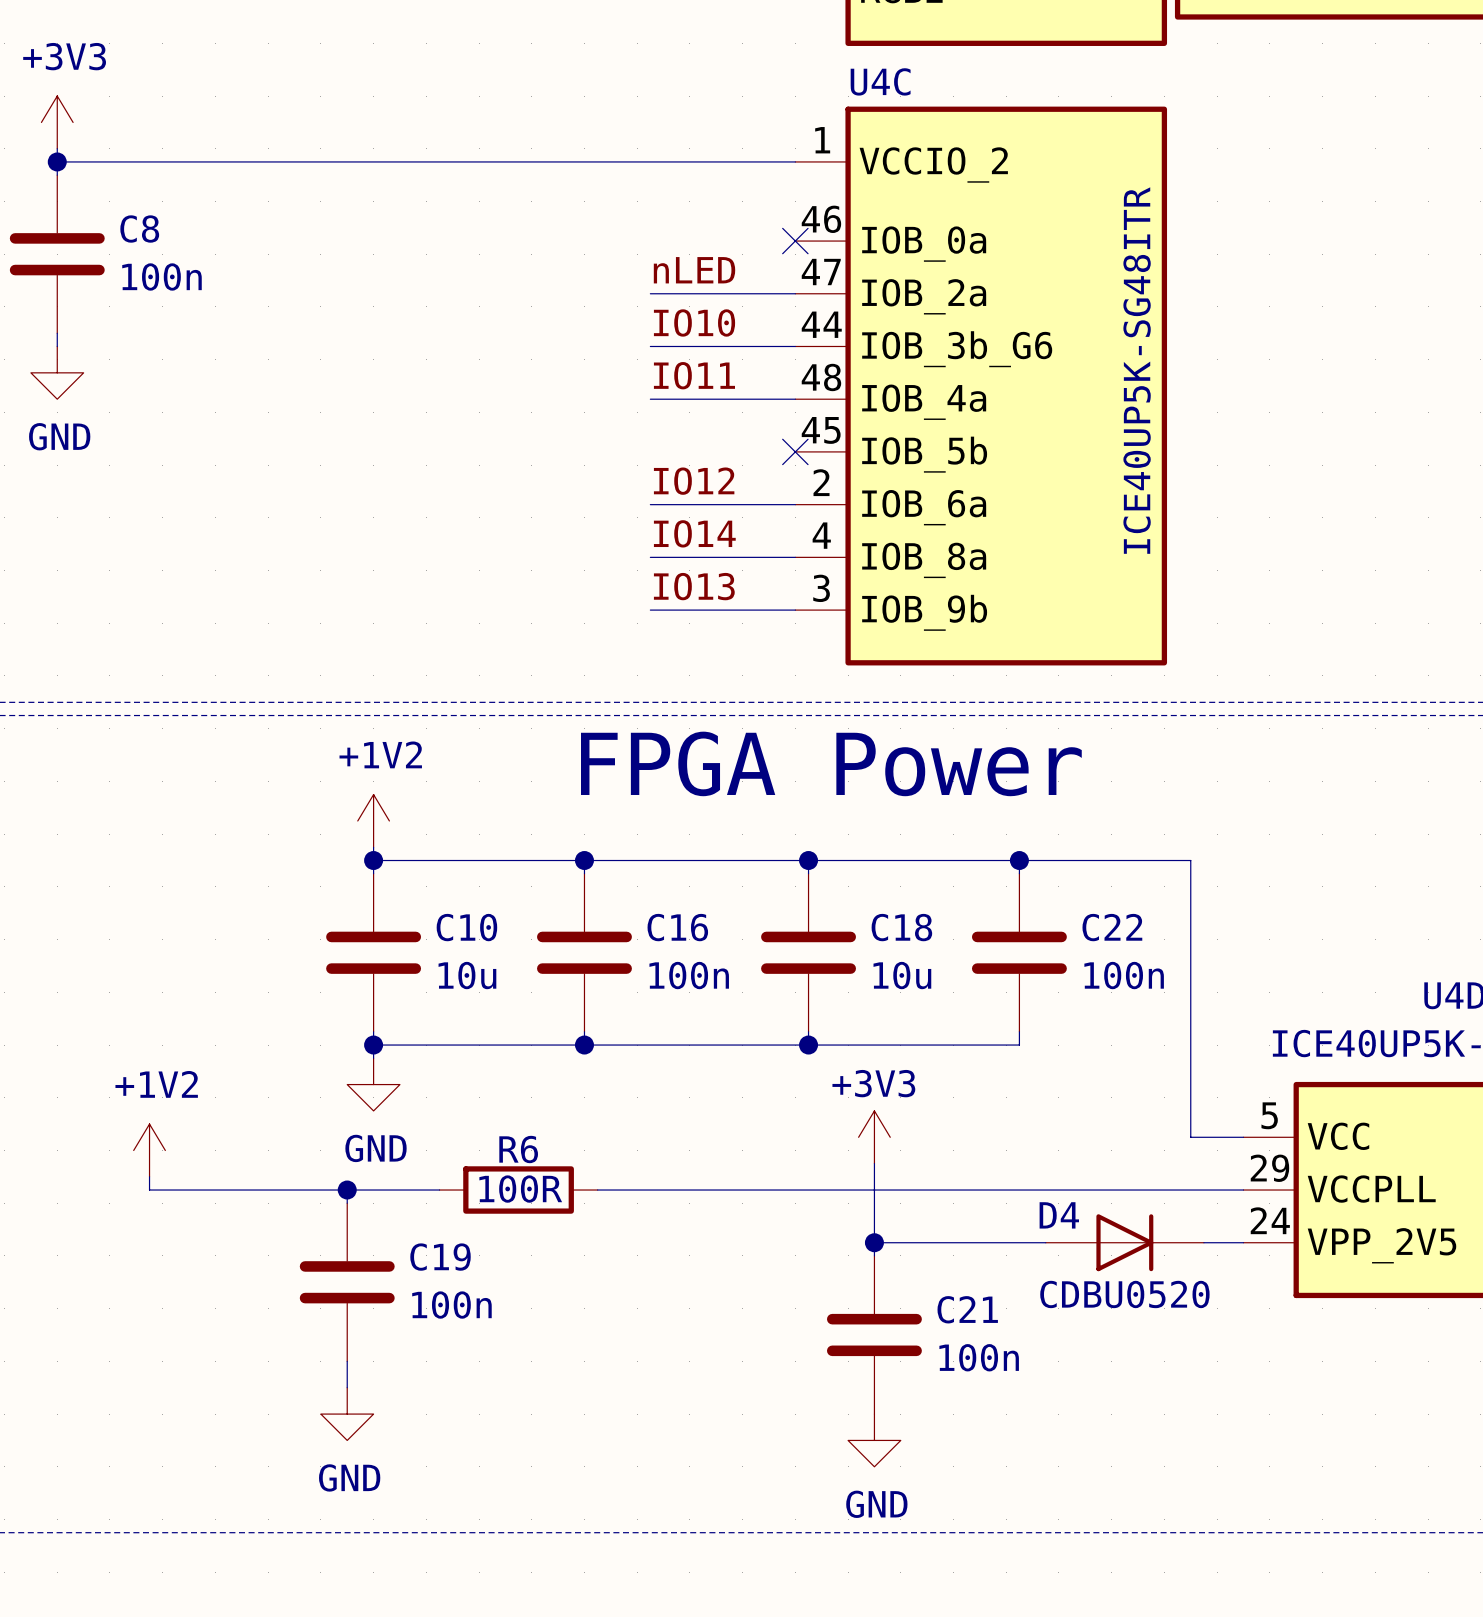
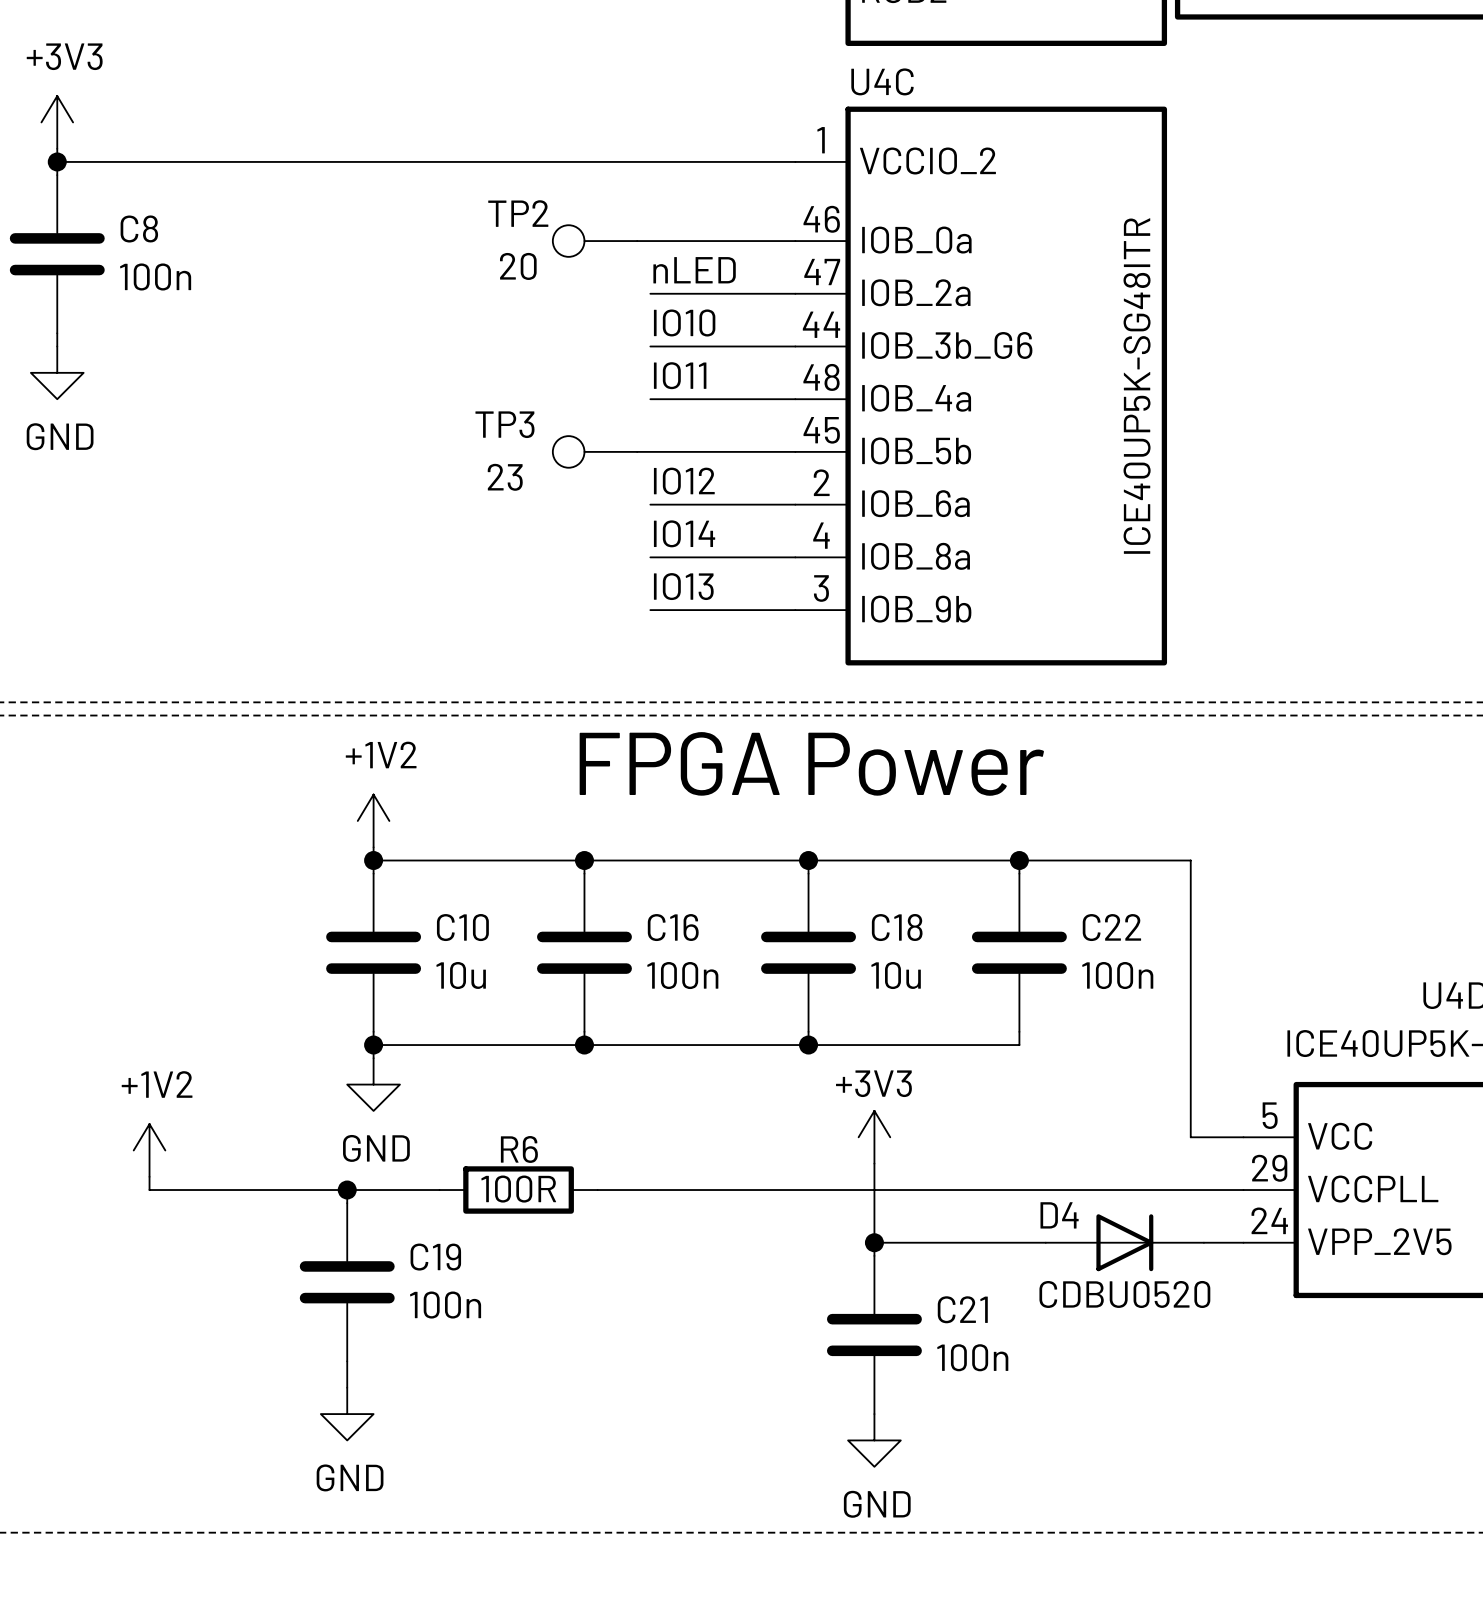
TP2: none -> 20 (595, 241)
wire: none -> (637, 241) (795, 241)
no-connect mark: (795, 241) -> none
TP3: none -> 23 (595, 451)
wire: none -> (637, 451) (795, 451)
no-connect mark: (795, 451) -> none

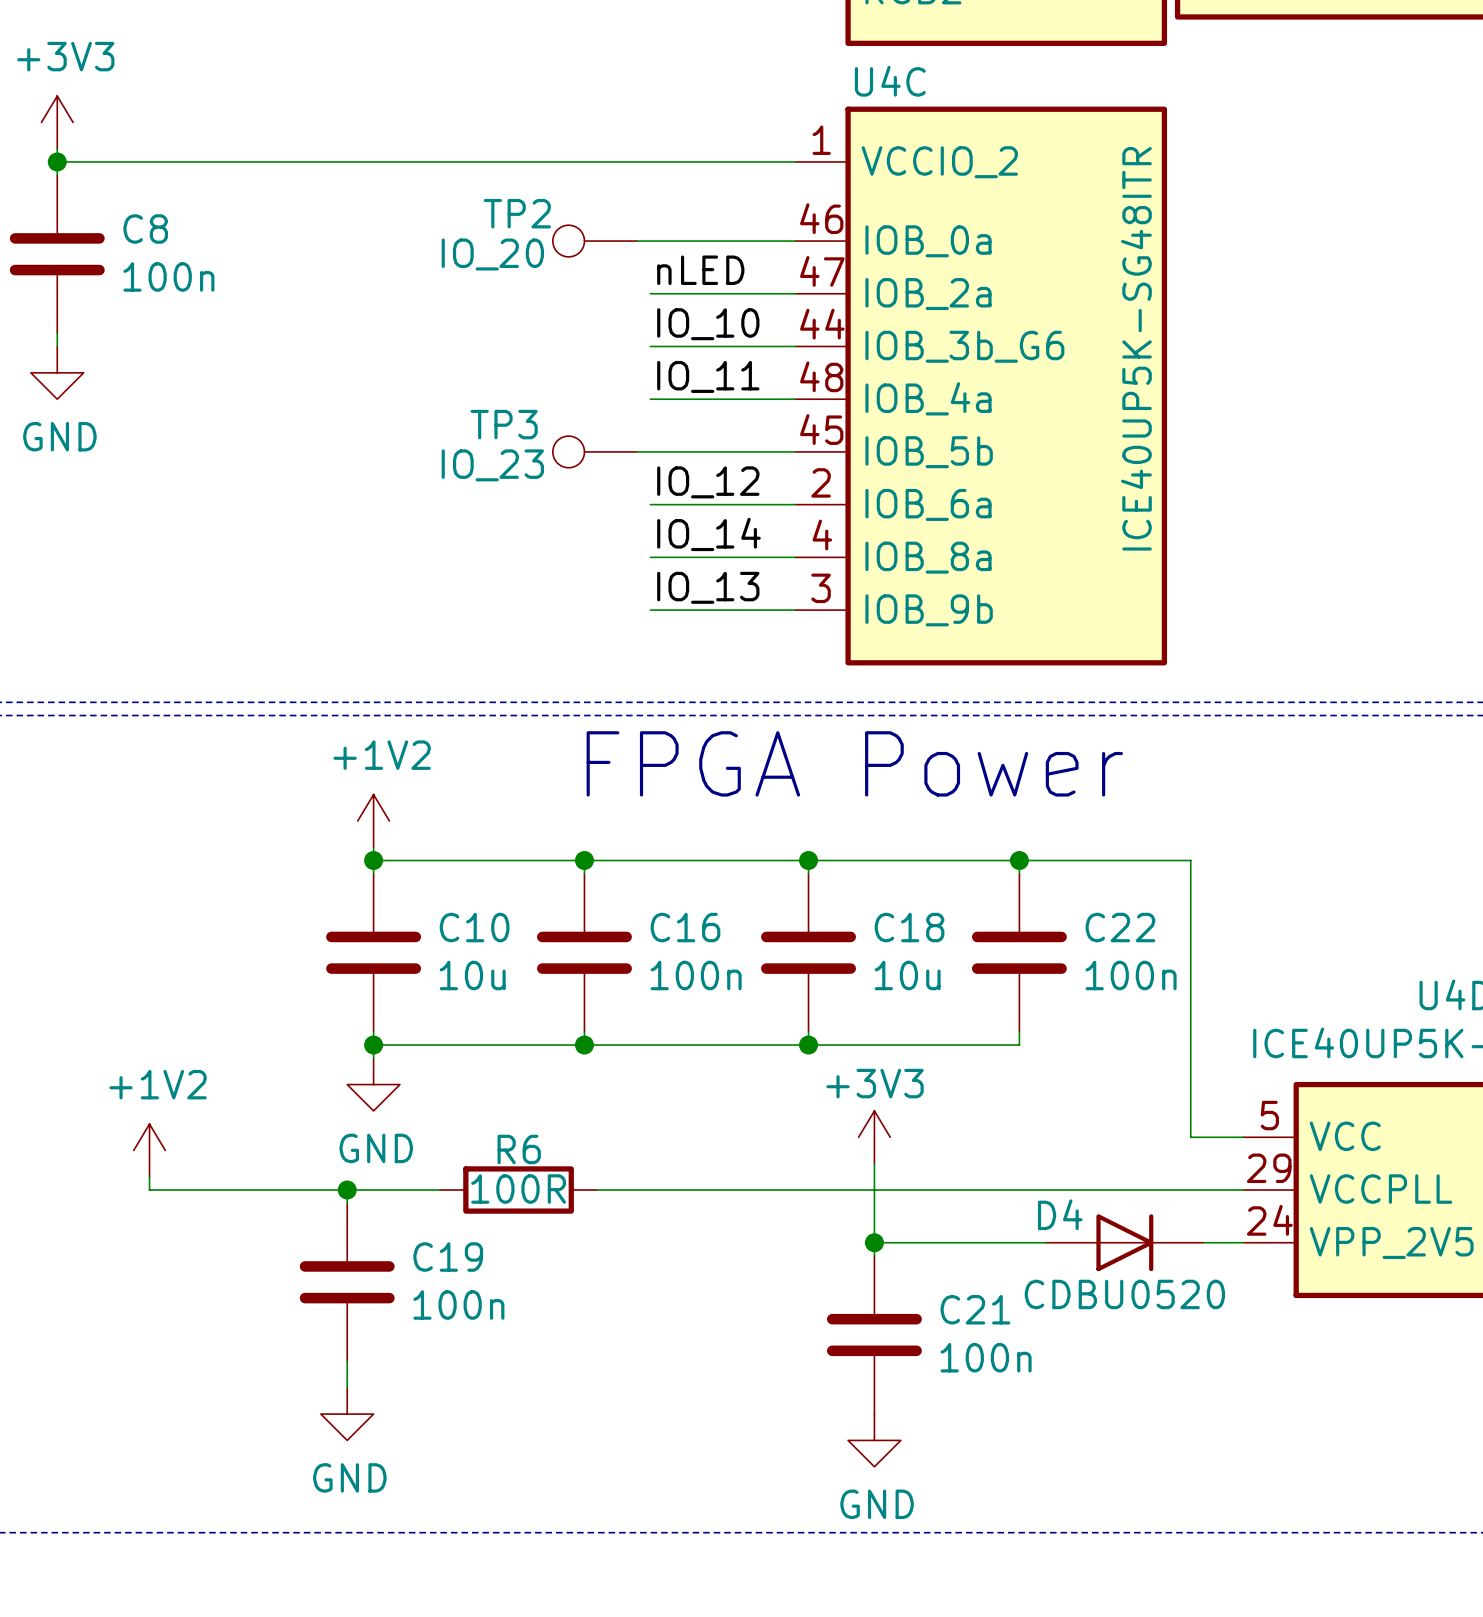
TP2 value: 20 (518, 266) -> IO_20 (492, 254)
label: IO10 (684, 322) -> IO_10 (708, 324)
label: IO11 (680, 375) -> IO_11 (708, 376)
TP3 value: 23 (505, 477) -> IO_23 (492, 465)
label: IO12 (684, 481) -> IO_12 (708, 482)
label: IO14 (684, 533) -> IO_14 (708, 534)
label: IO13 (683, 586) -> IO_13 (708, 587)

